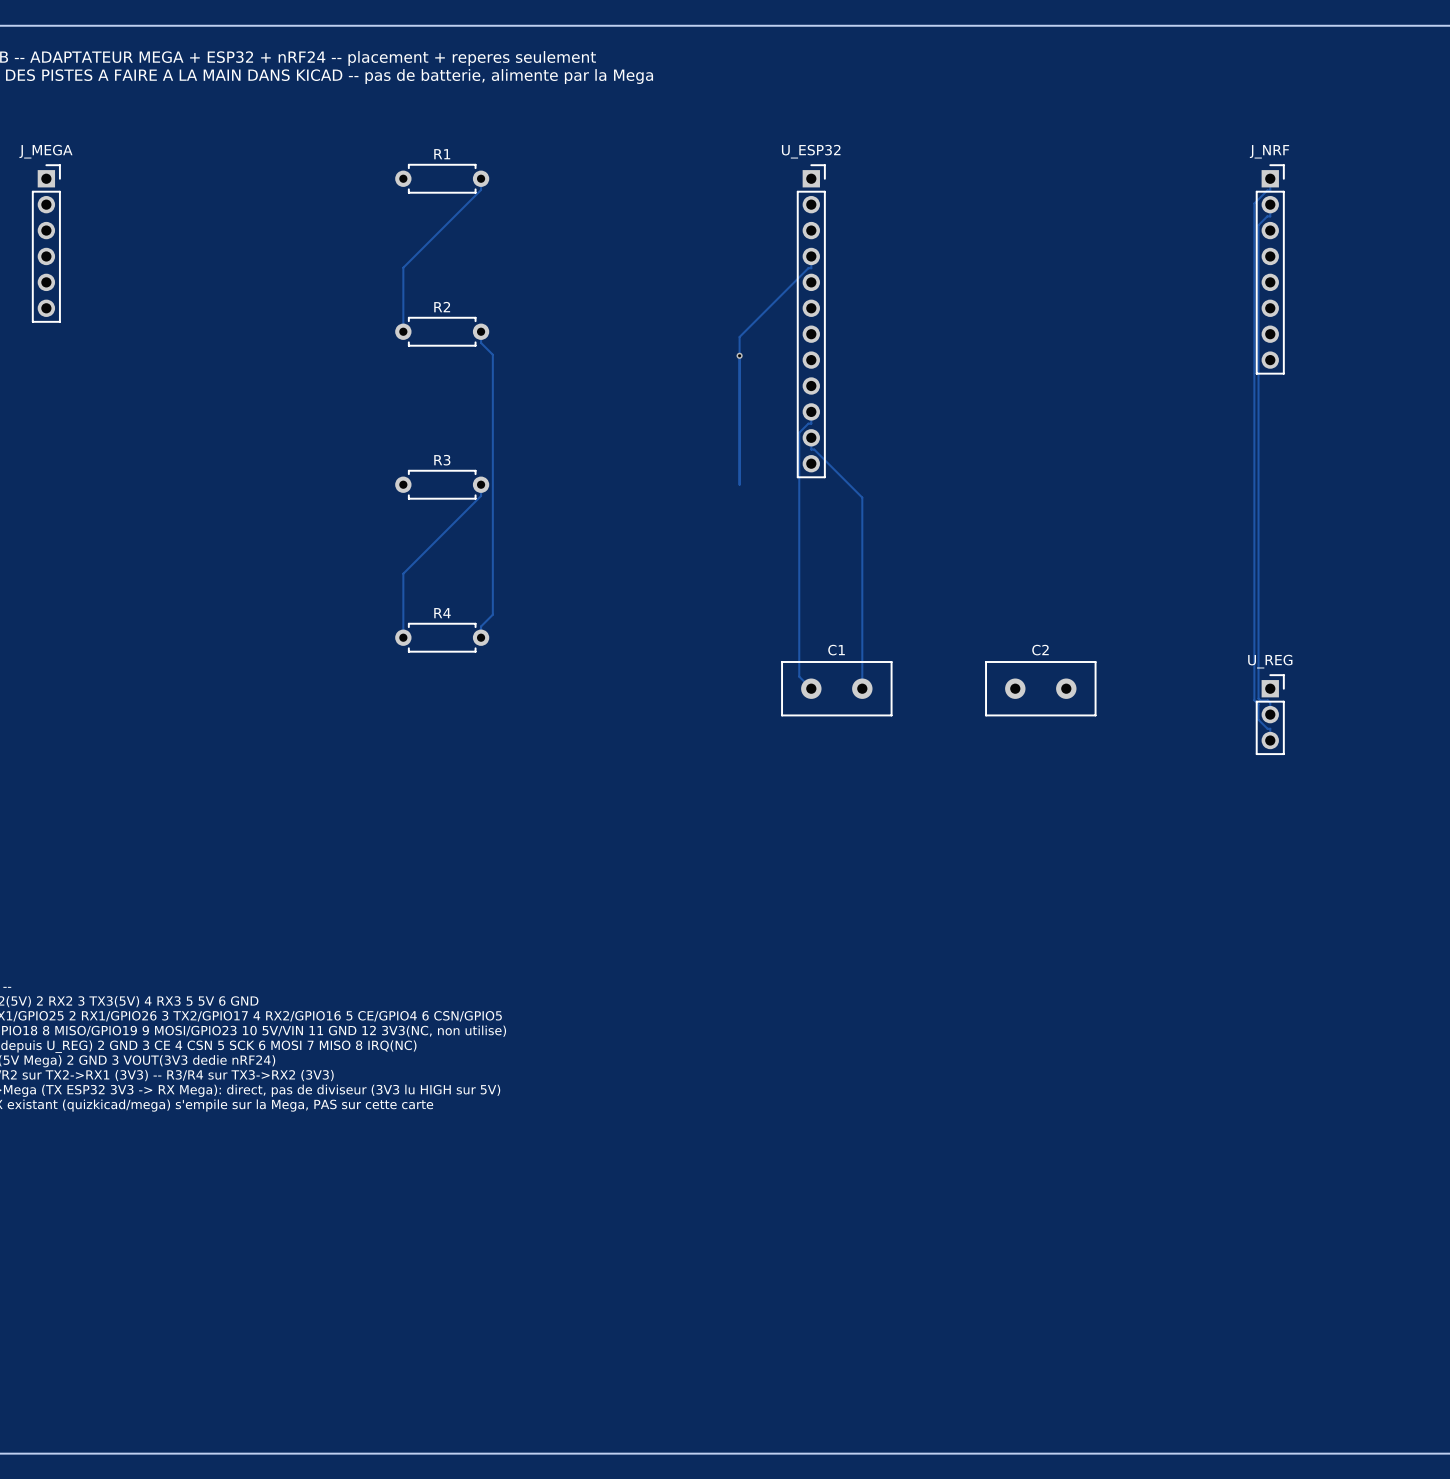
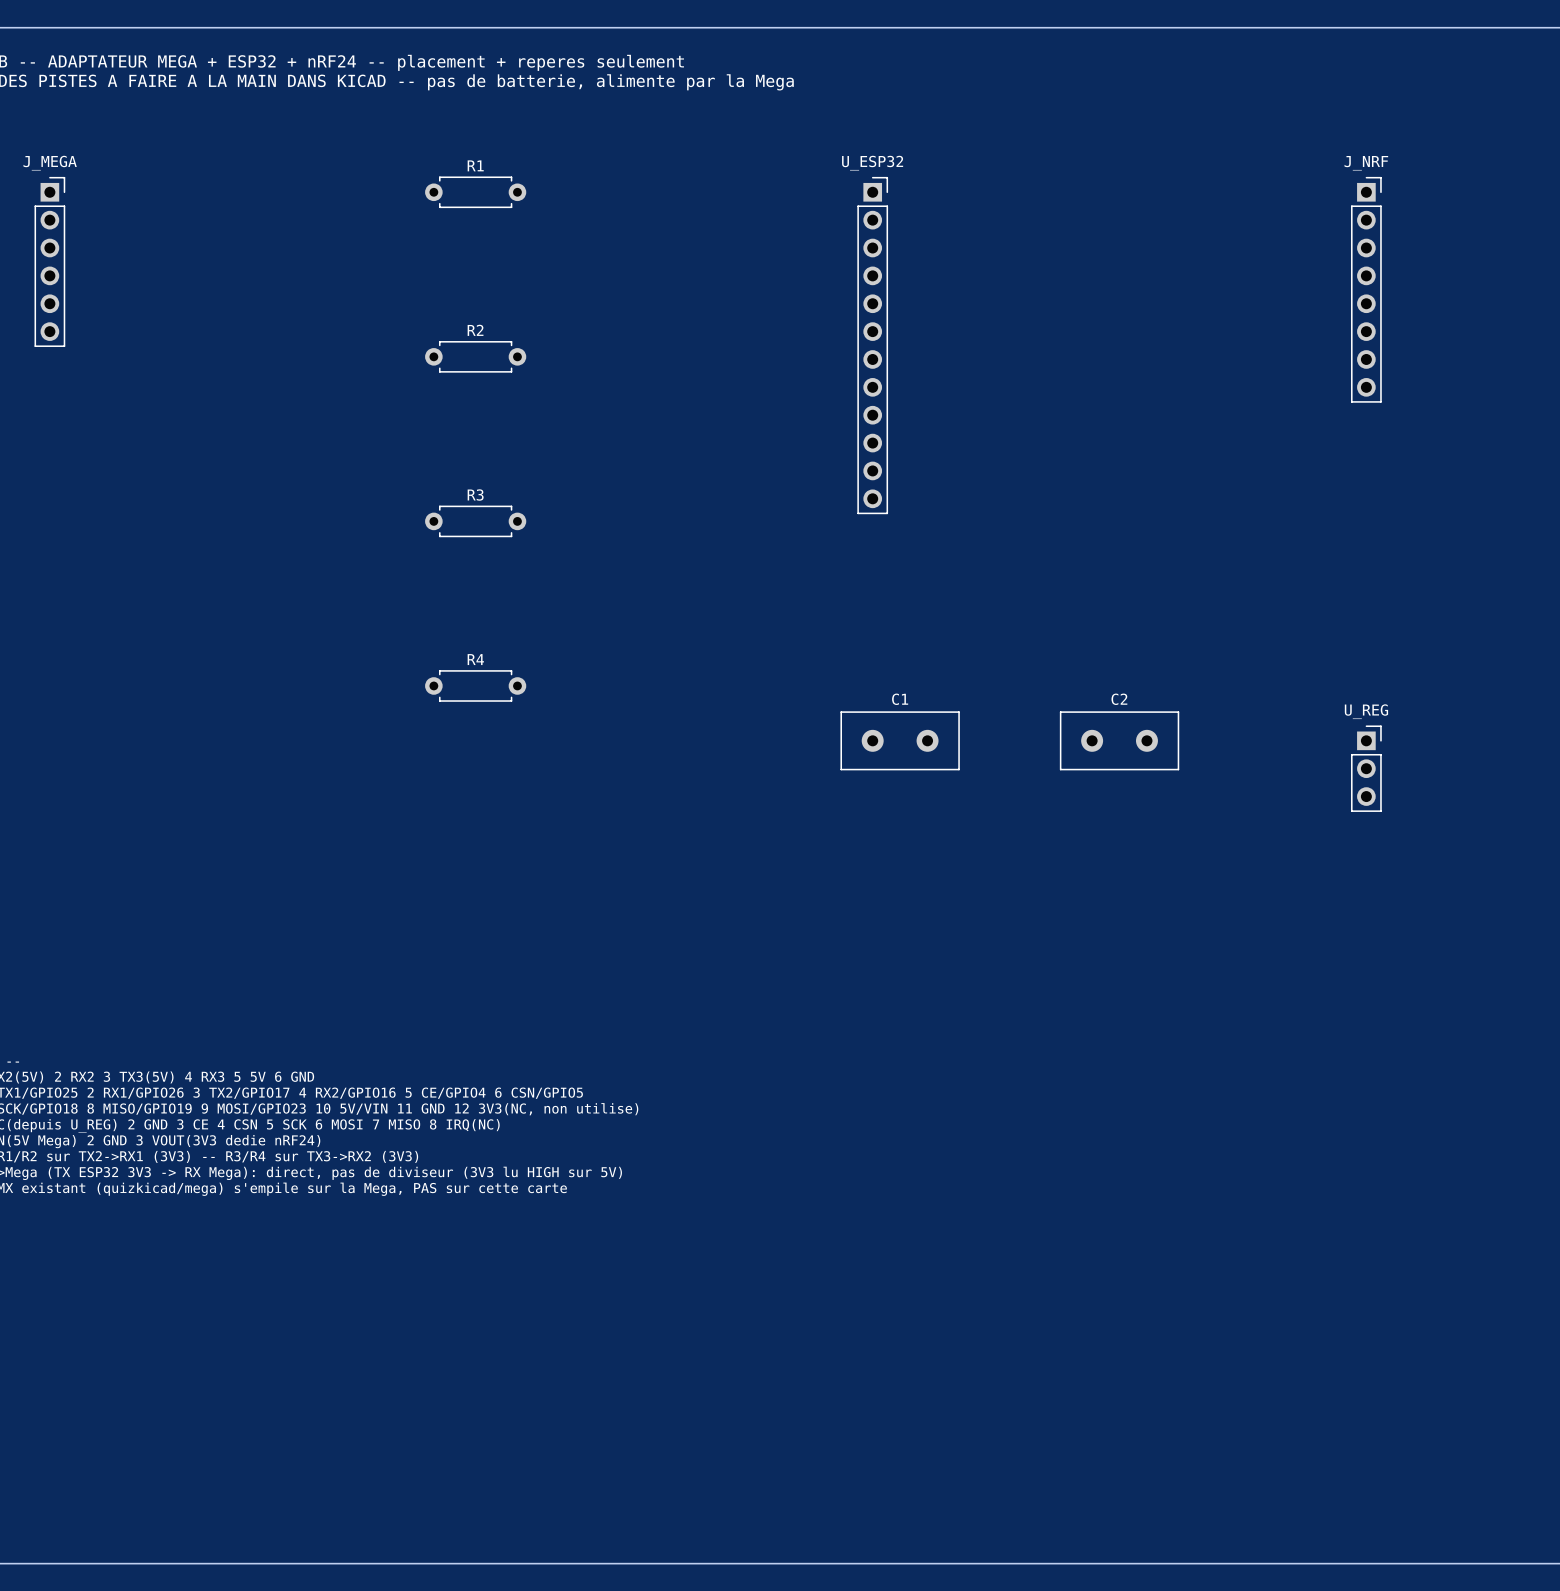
track: (481, 178) (481, 189) (403, 267) (403, 331) -> none
track: (1270, 178) (1270, 190) (1267, 190) (1254, 203) (1254, 700) (1258, 704) (1258, 719) (1267, 728) (1270, 728) (1270, 740) -> none
track: (1270, 204) (1270, 216) (1267, 216) (1258, 225) (1258, 698) (1270, 702) (1270, 714) -> none
track: (811, 256) (811, 268) (808, 268) (739, 336) (739, 484) -> none
track: (481, 331) (481, 342) (492, 354) (492, 614) (481, 626) (481, 637) -> none
via: (739, 355) -> none
track: (811, 411) (811, 423) (808, 423) (799, 432) (799, 676) (811, 688) -> none
track: (811, 437) (811, 449) (814, 449) (862, 497) (862, 688) -> none
track: (481, 484) (481, 495) (403, 573) (403, 637) -> none

